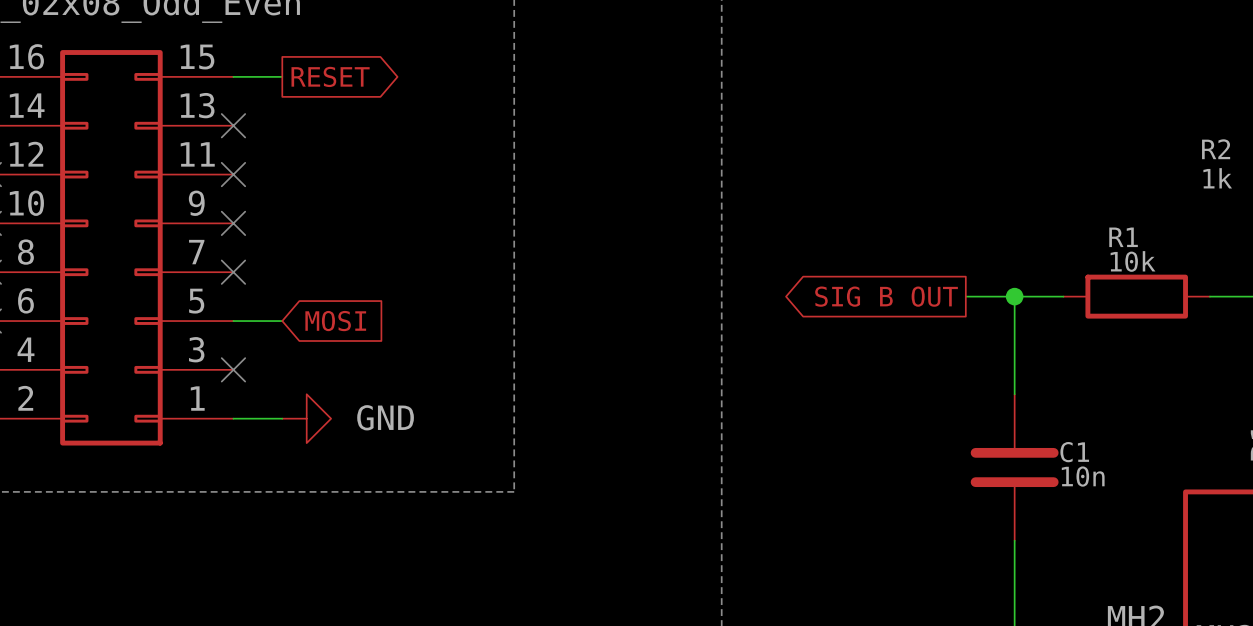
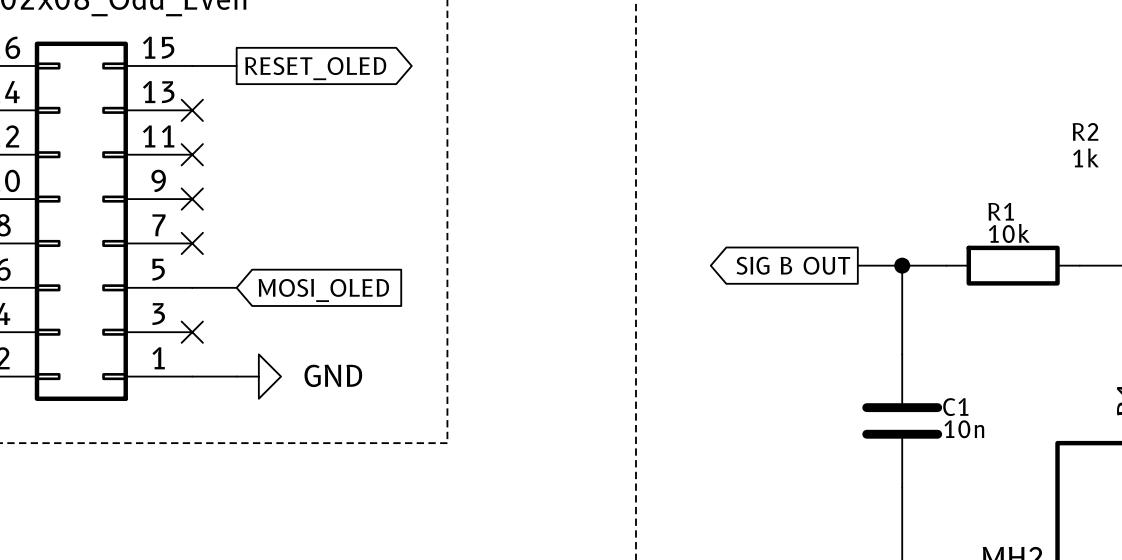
global label: RESET (330, 76) -> RESET_OLED (315, 68)
global label: MOSI (335, 321) -> MOSI_OLED (323, 290)

